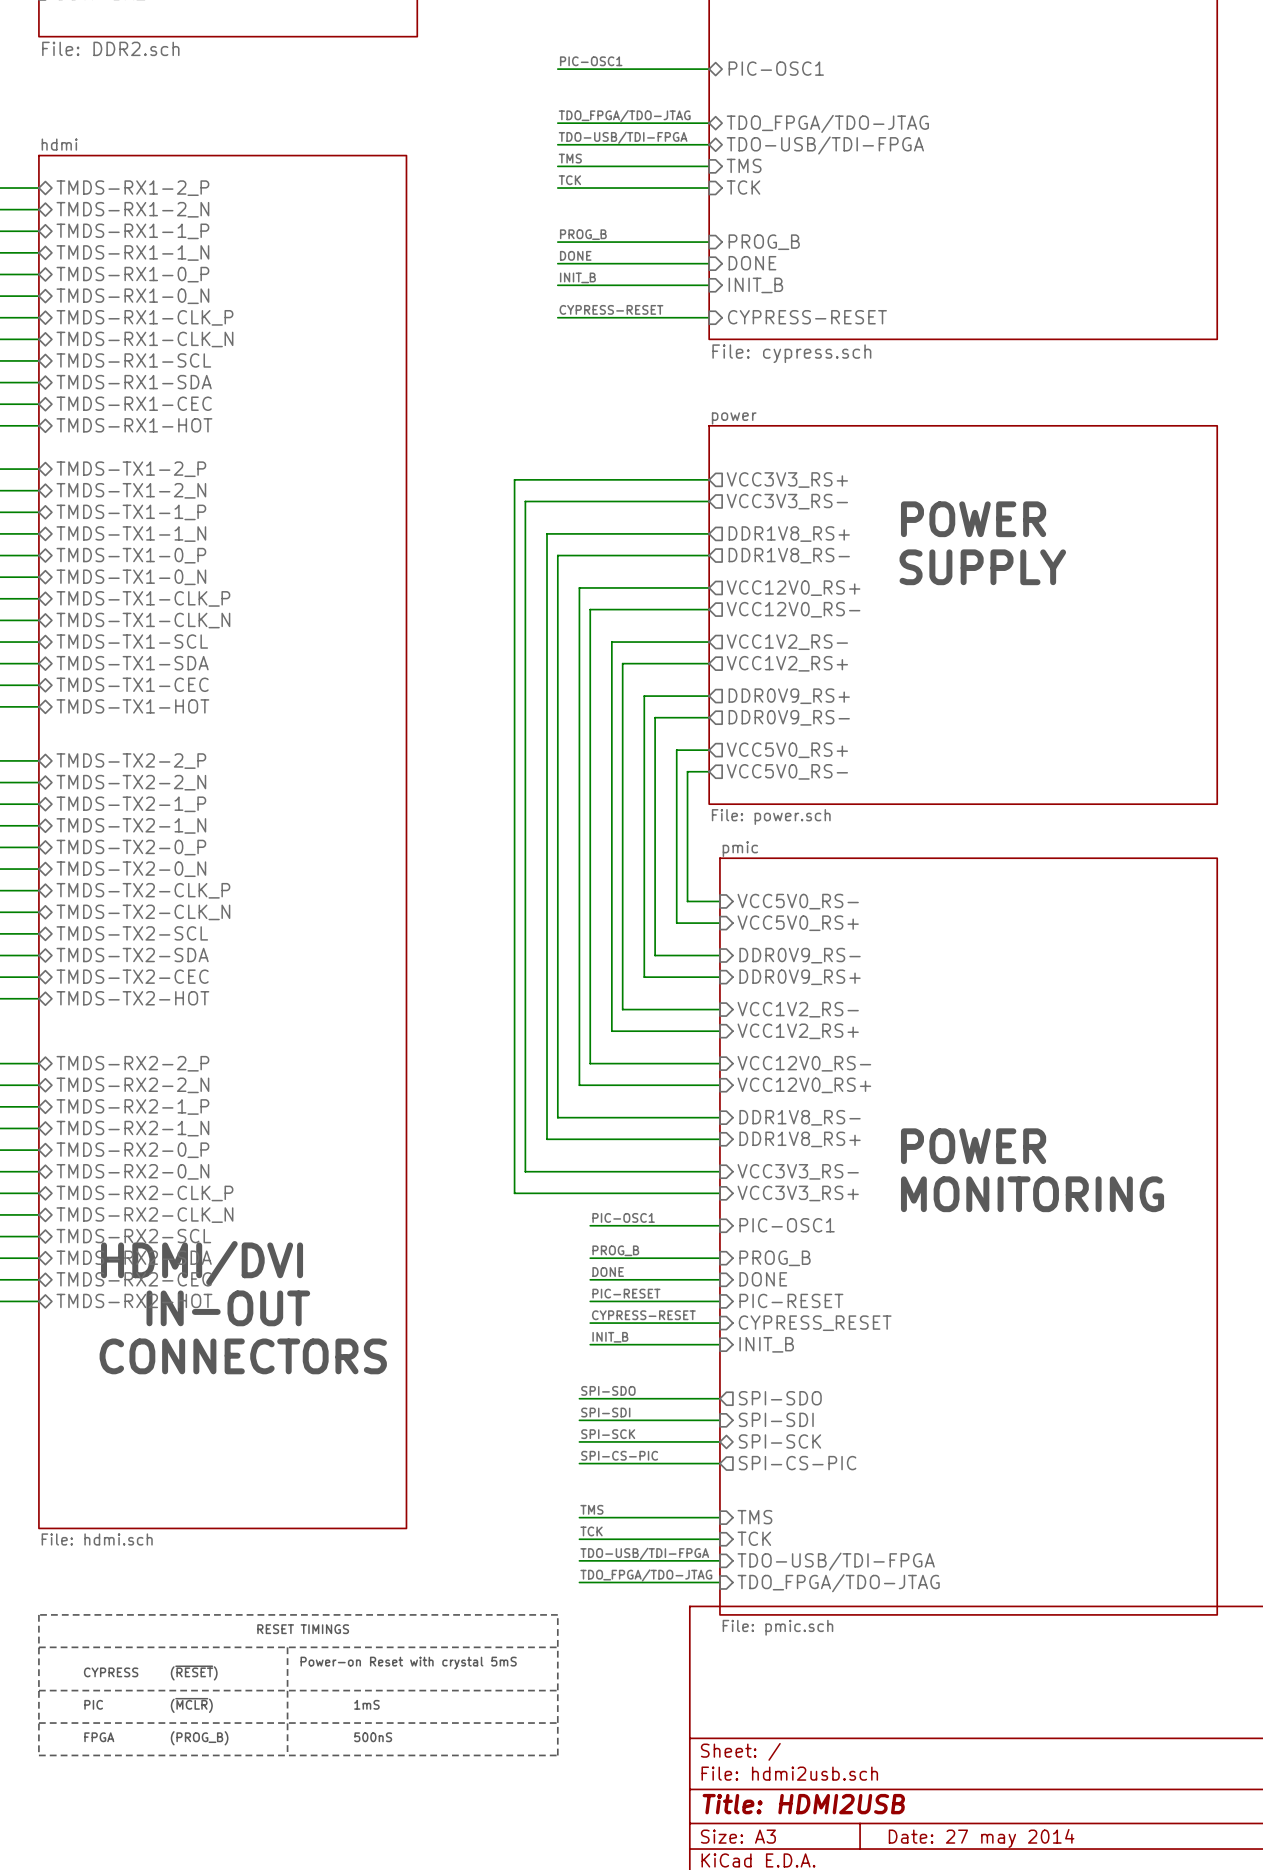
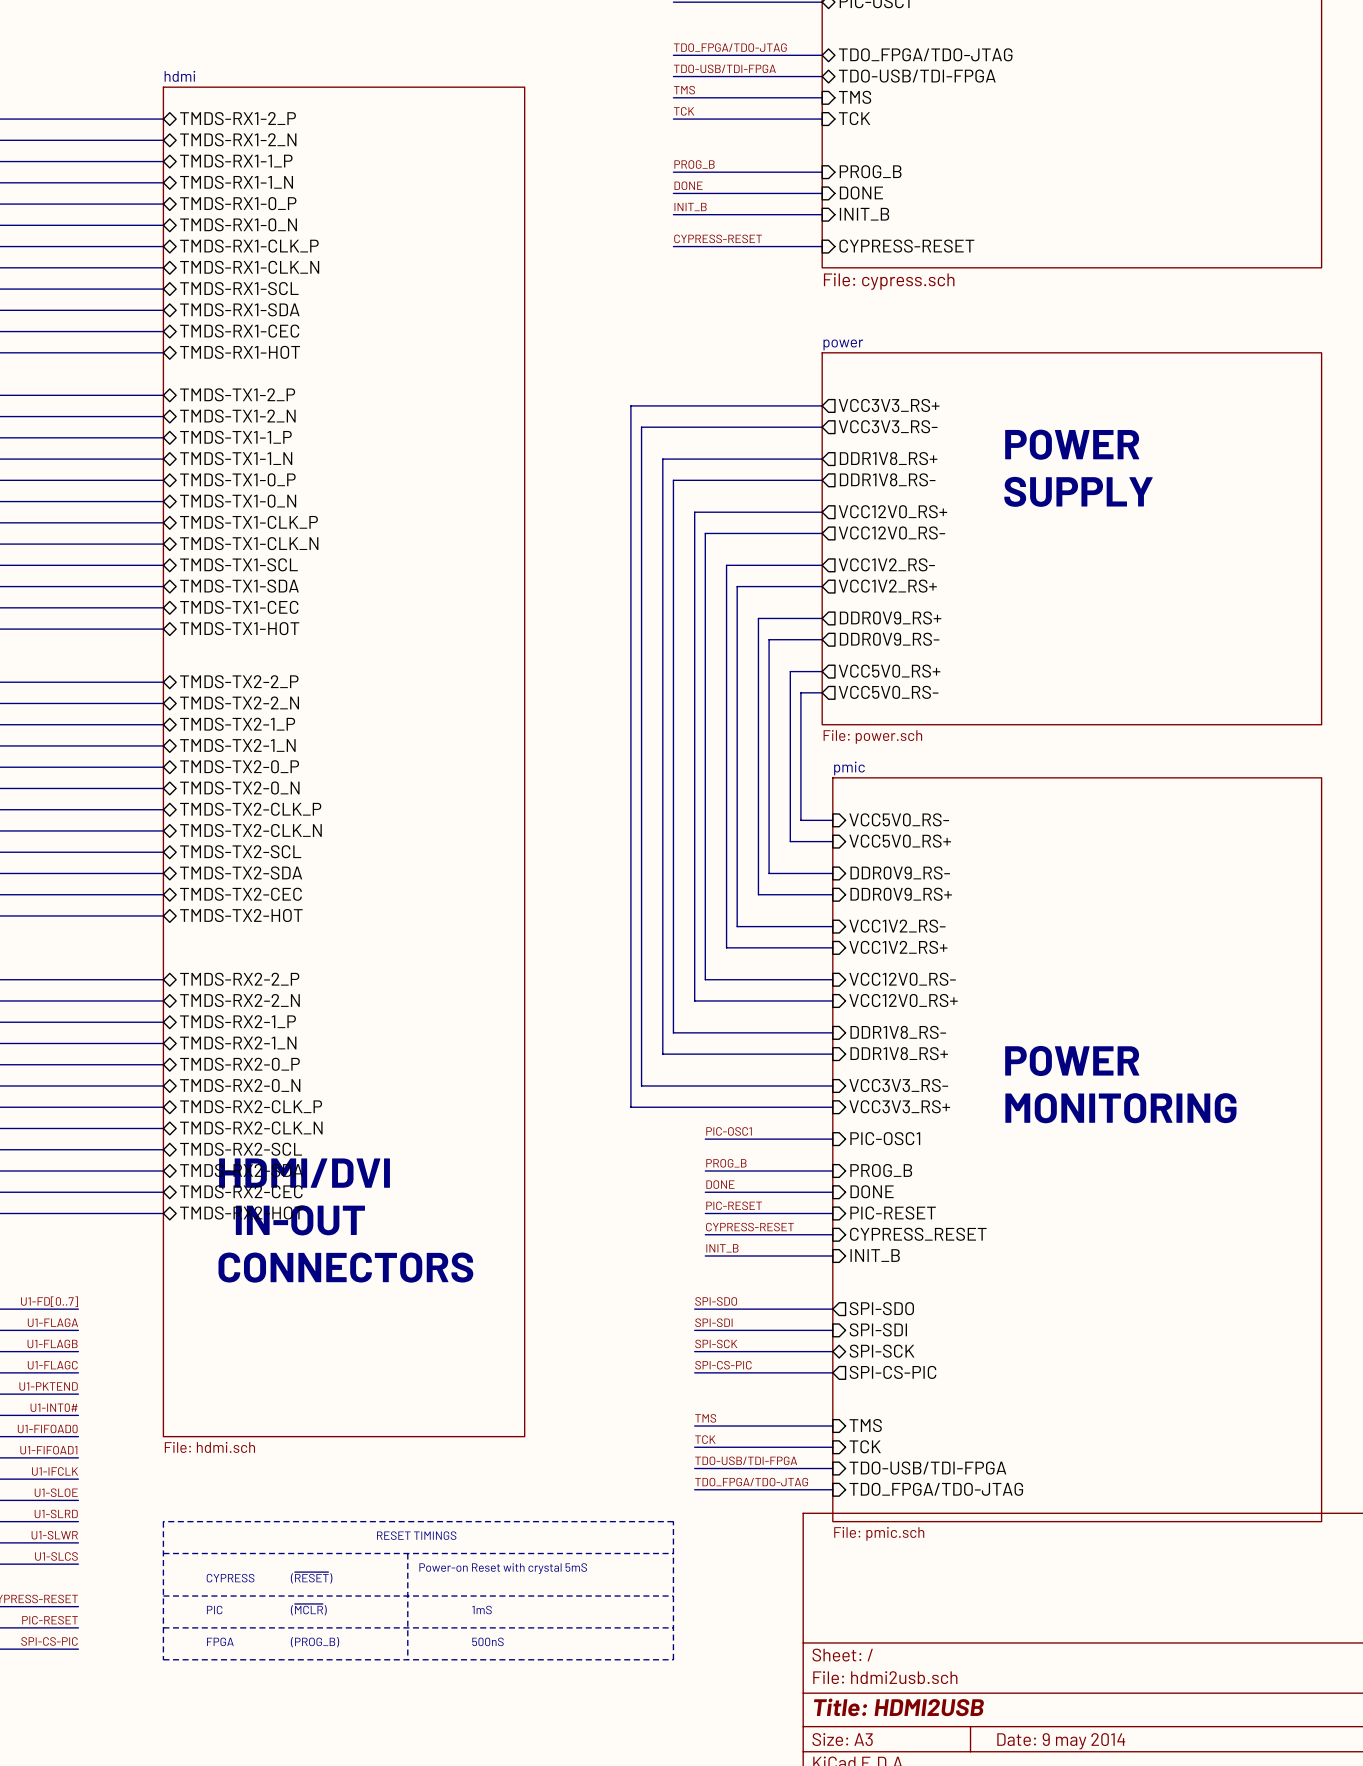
title block: Date: 27 may 2014 (981, 1838) -> Date: 9 may 2014 (1061, 1741)

